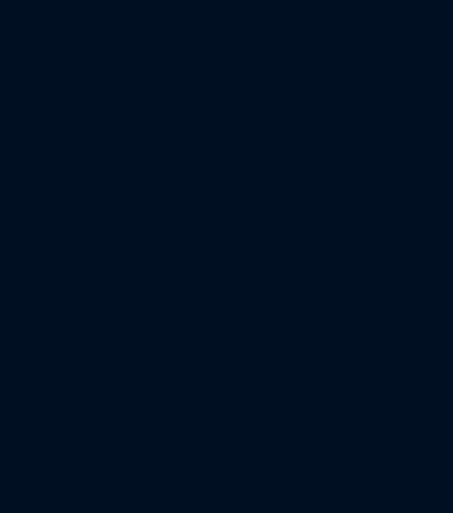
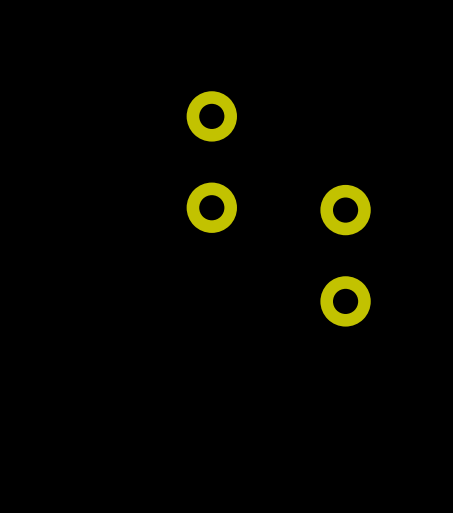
part: none -> (211, 162)
part: none -> (345, 255)

